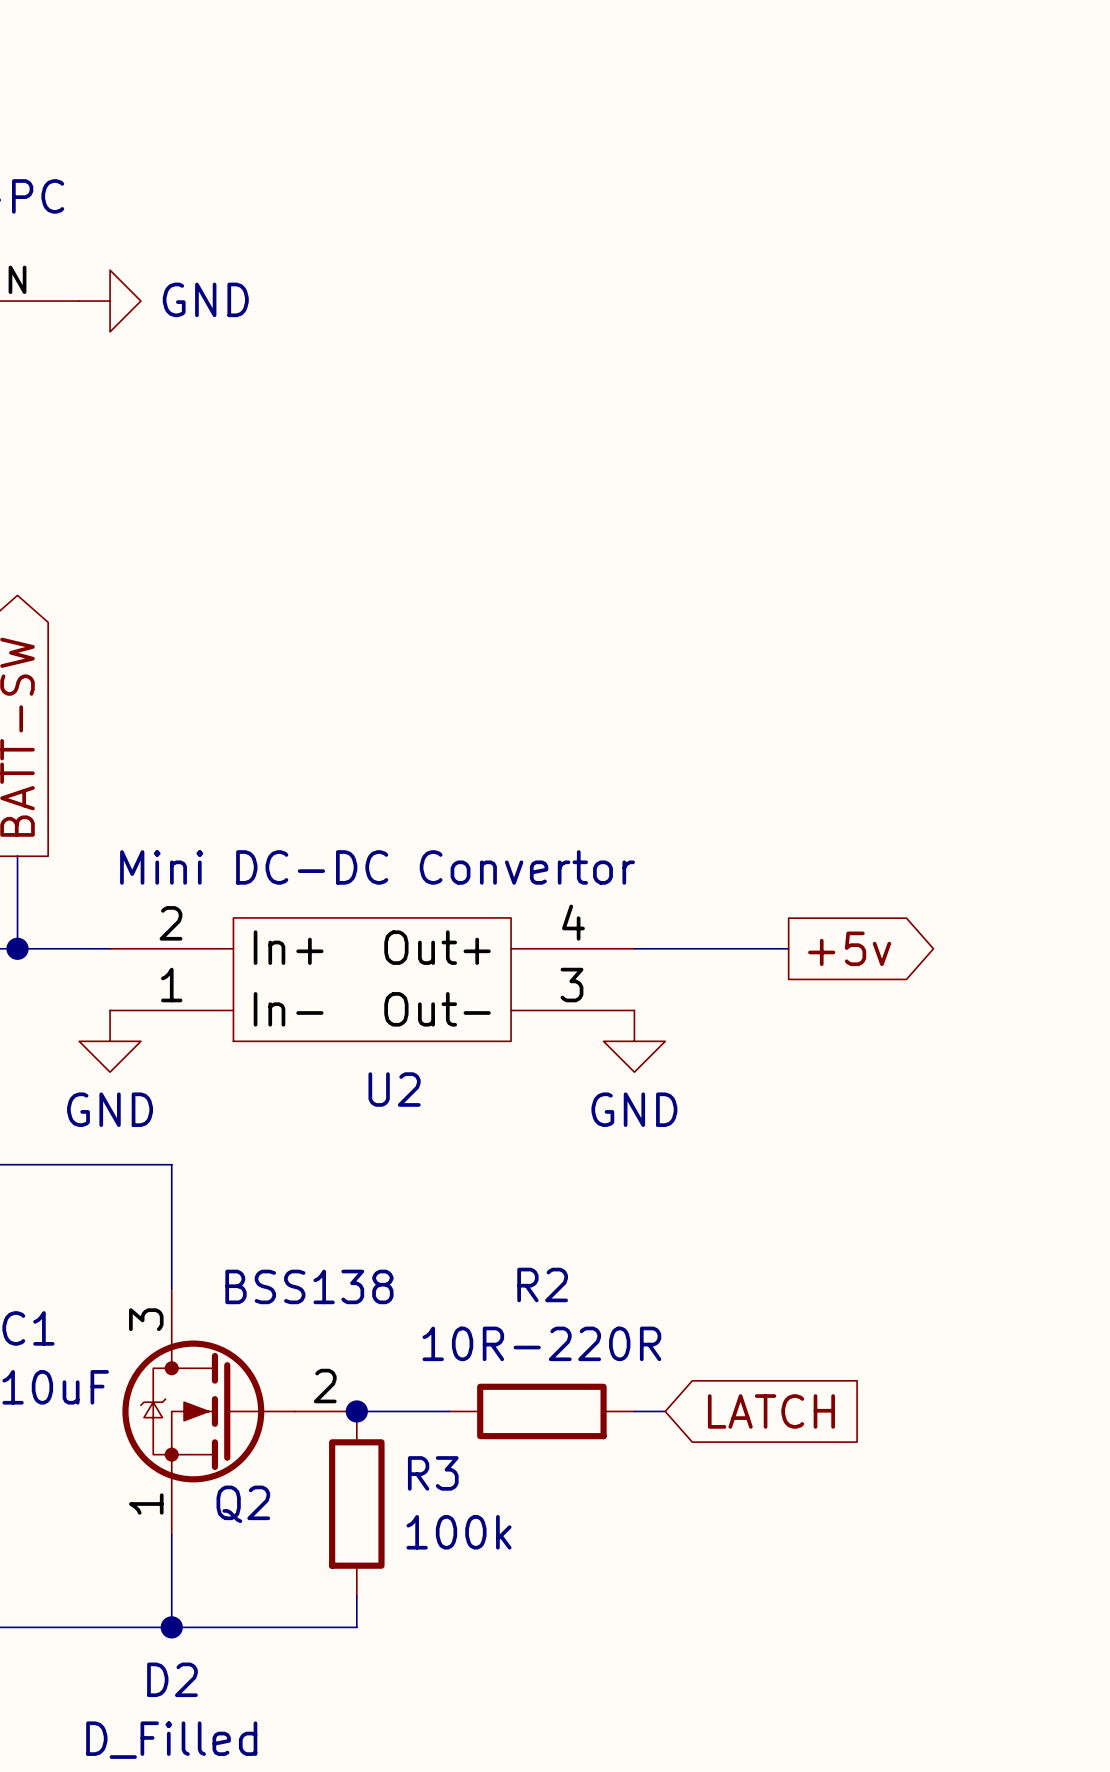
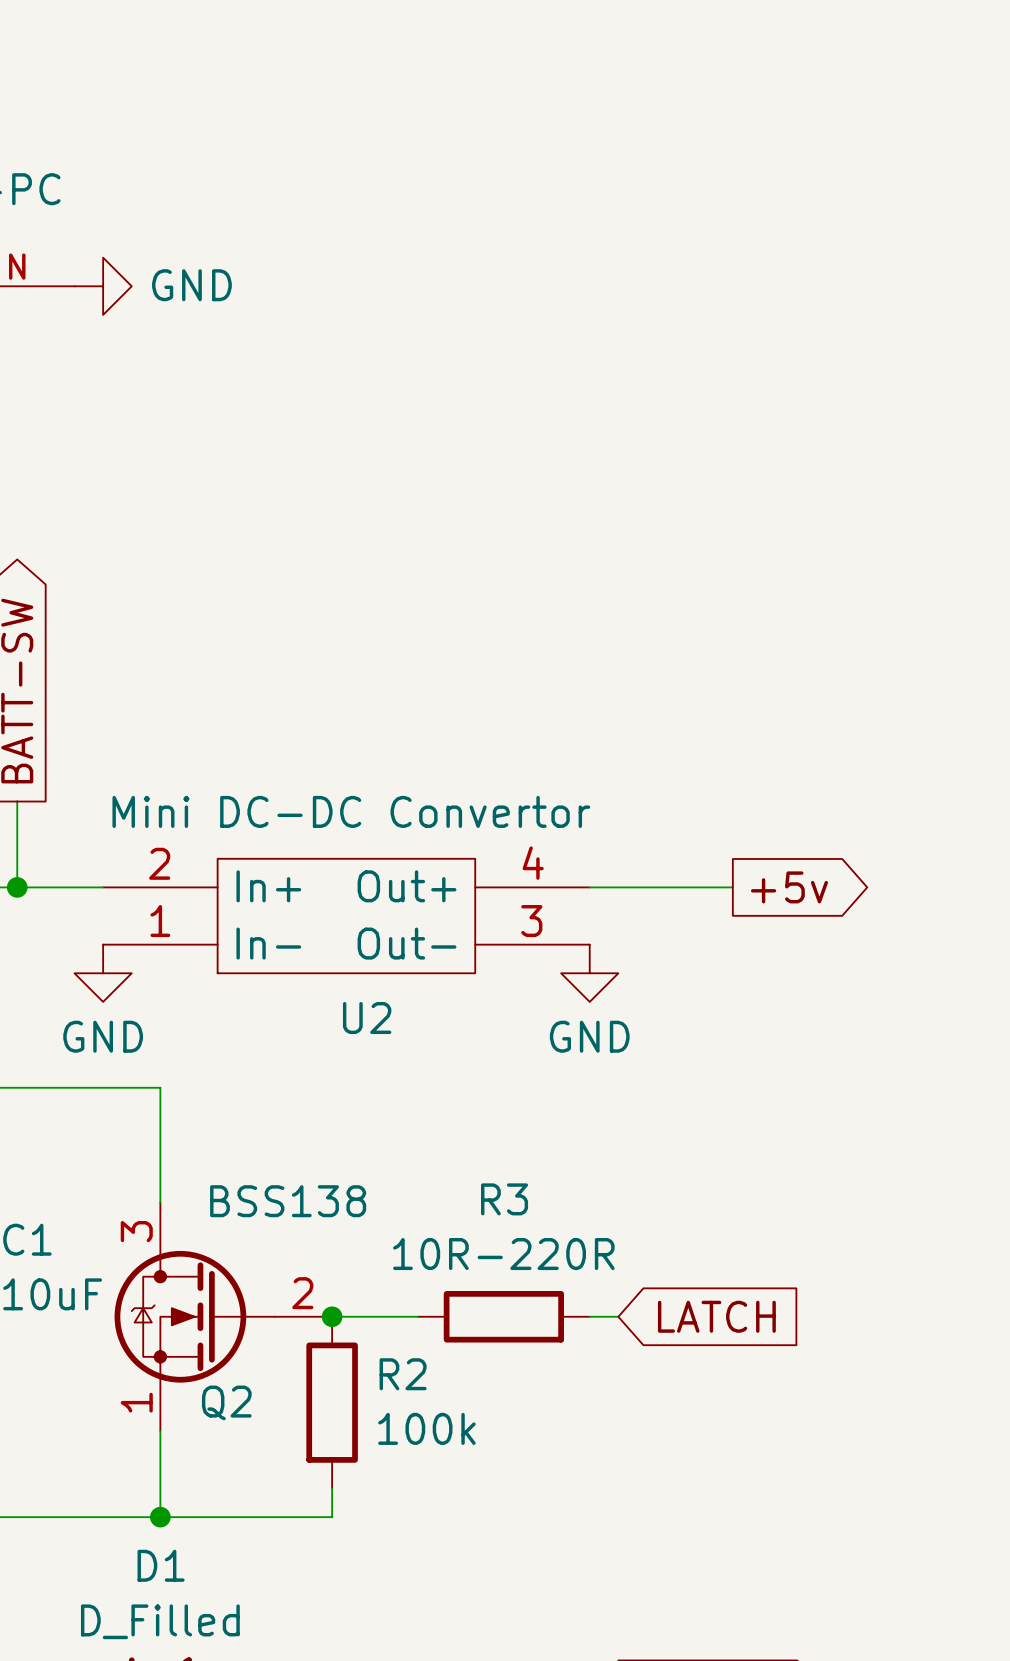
R2 name: R2 (542, 1284) -> R3 (504, 1199)
R3 name: R3 (433, 1473) -> R2 (403, 1374)
D2 name: D2 (172, 1679) -> D1 (161, 1565)

